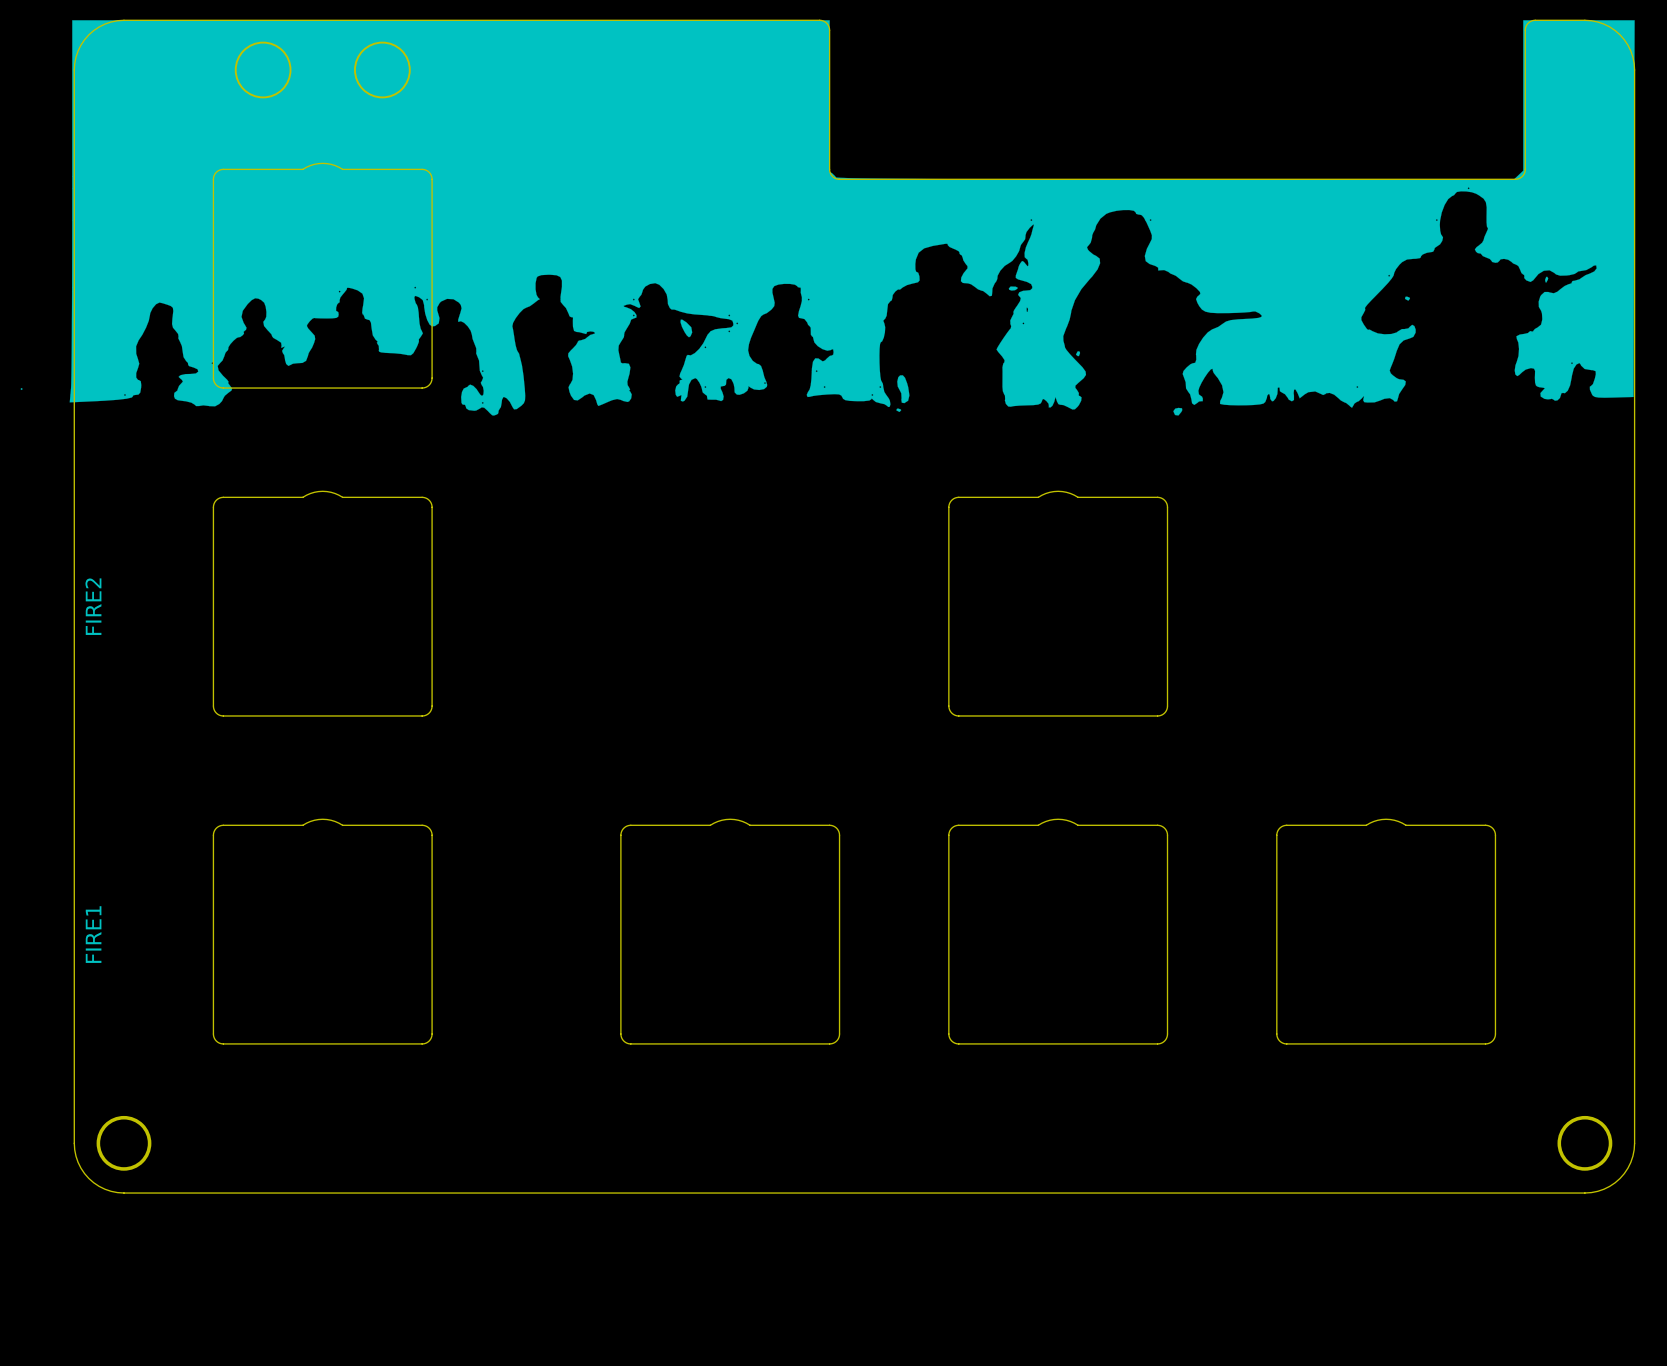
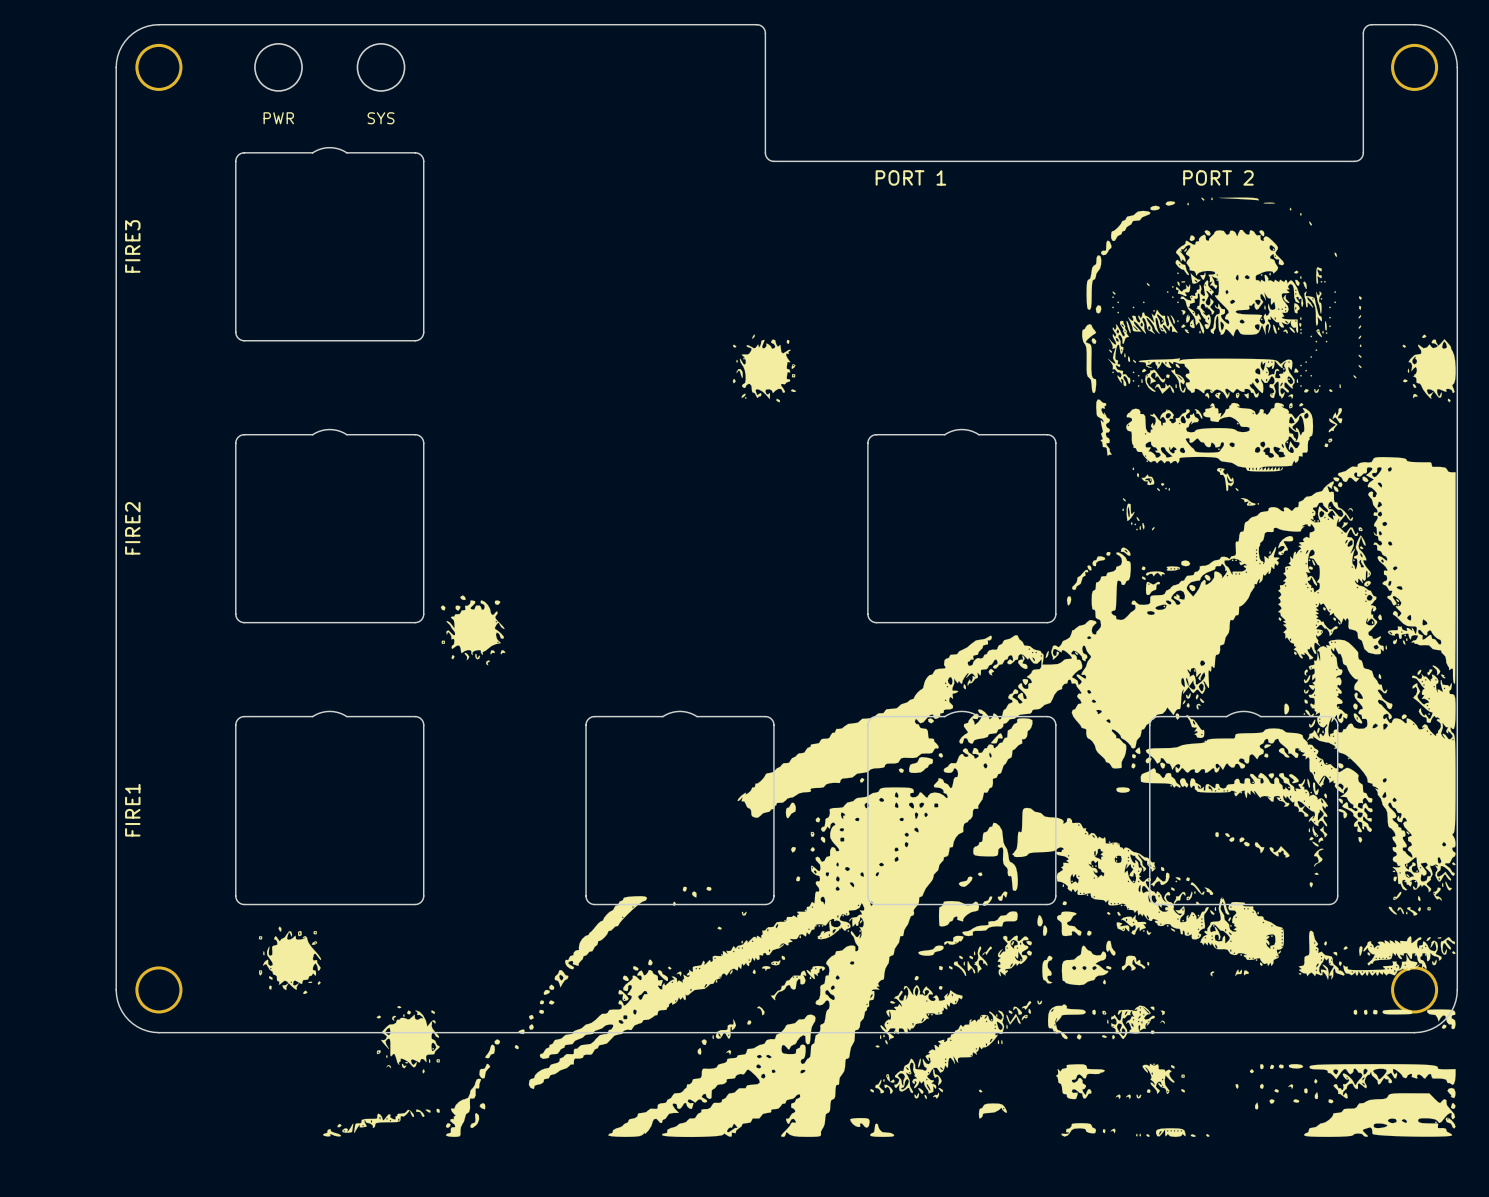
drawing: [20, 20, 1635, 416] -> none
drawing: none -> [258, 197, 1456, 1138]

